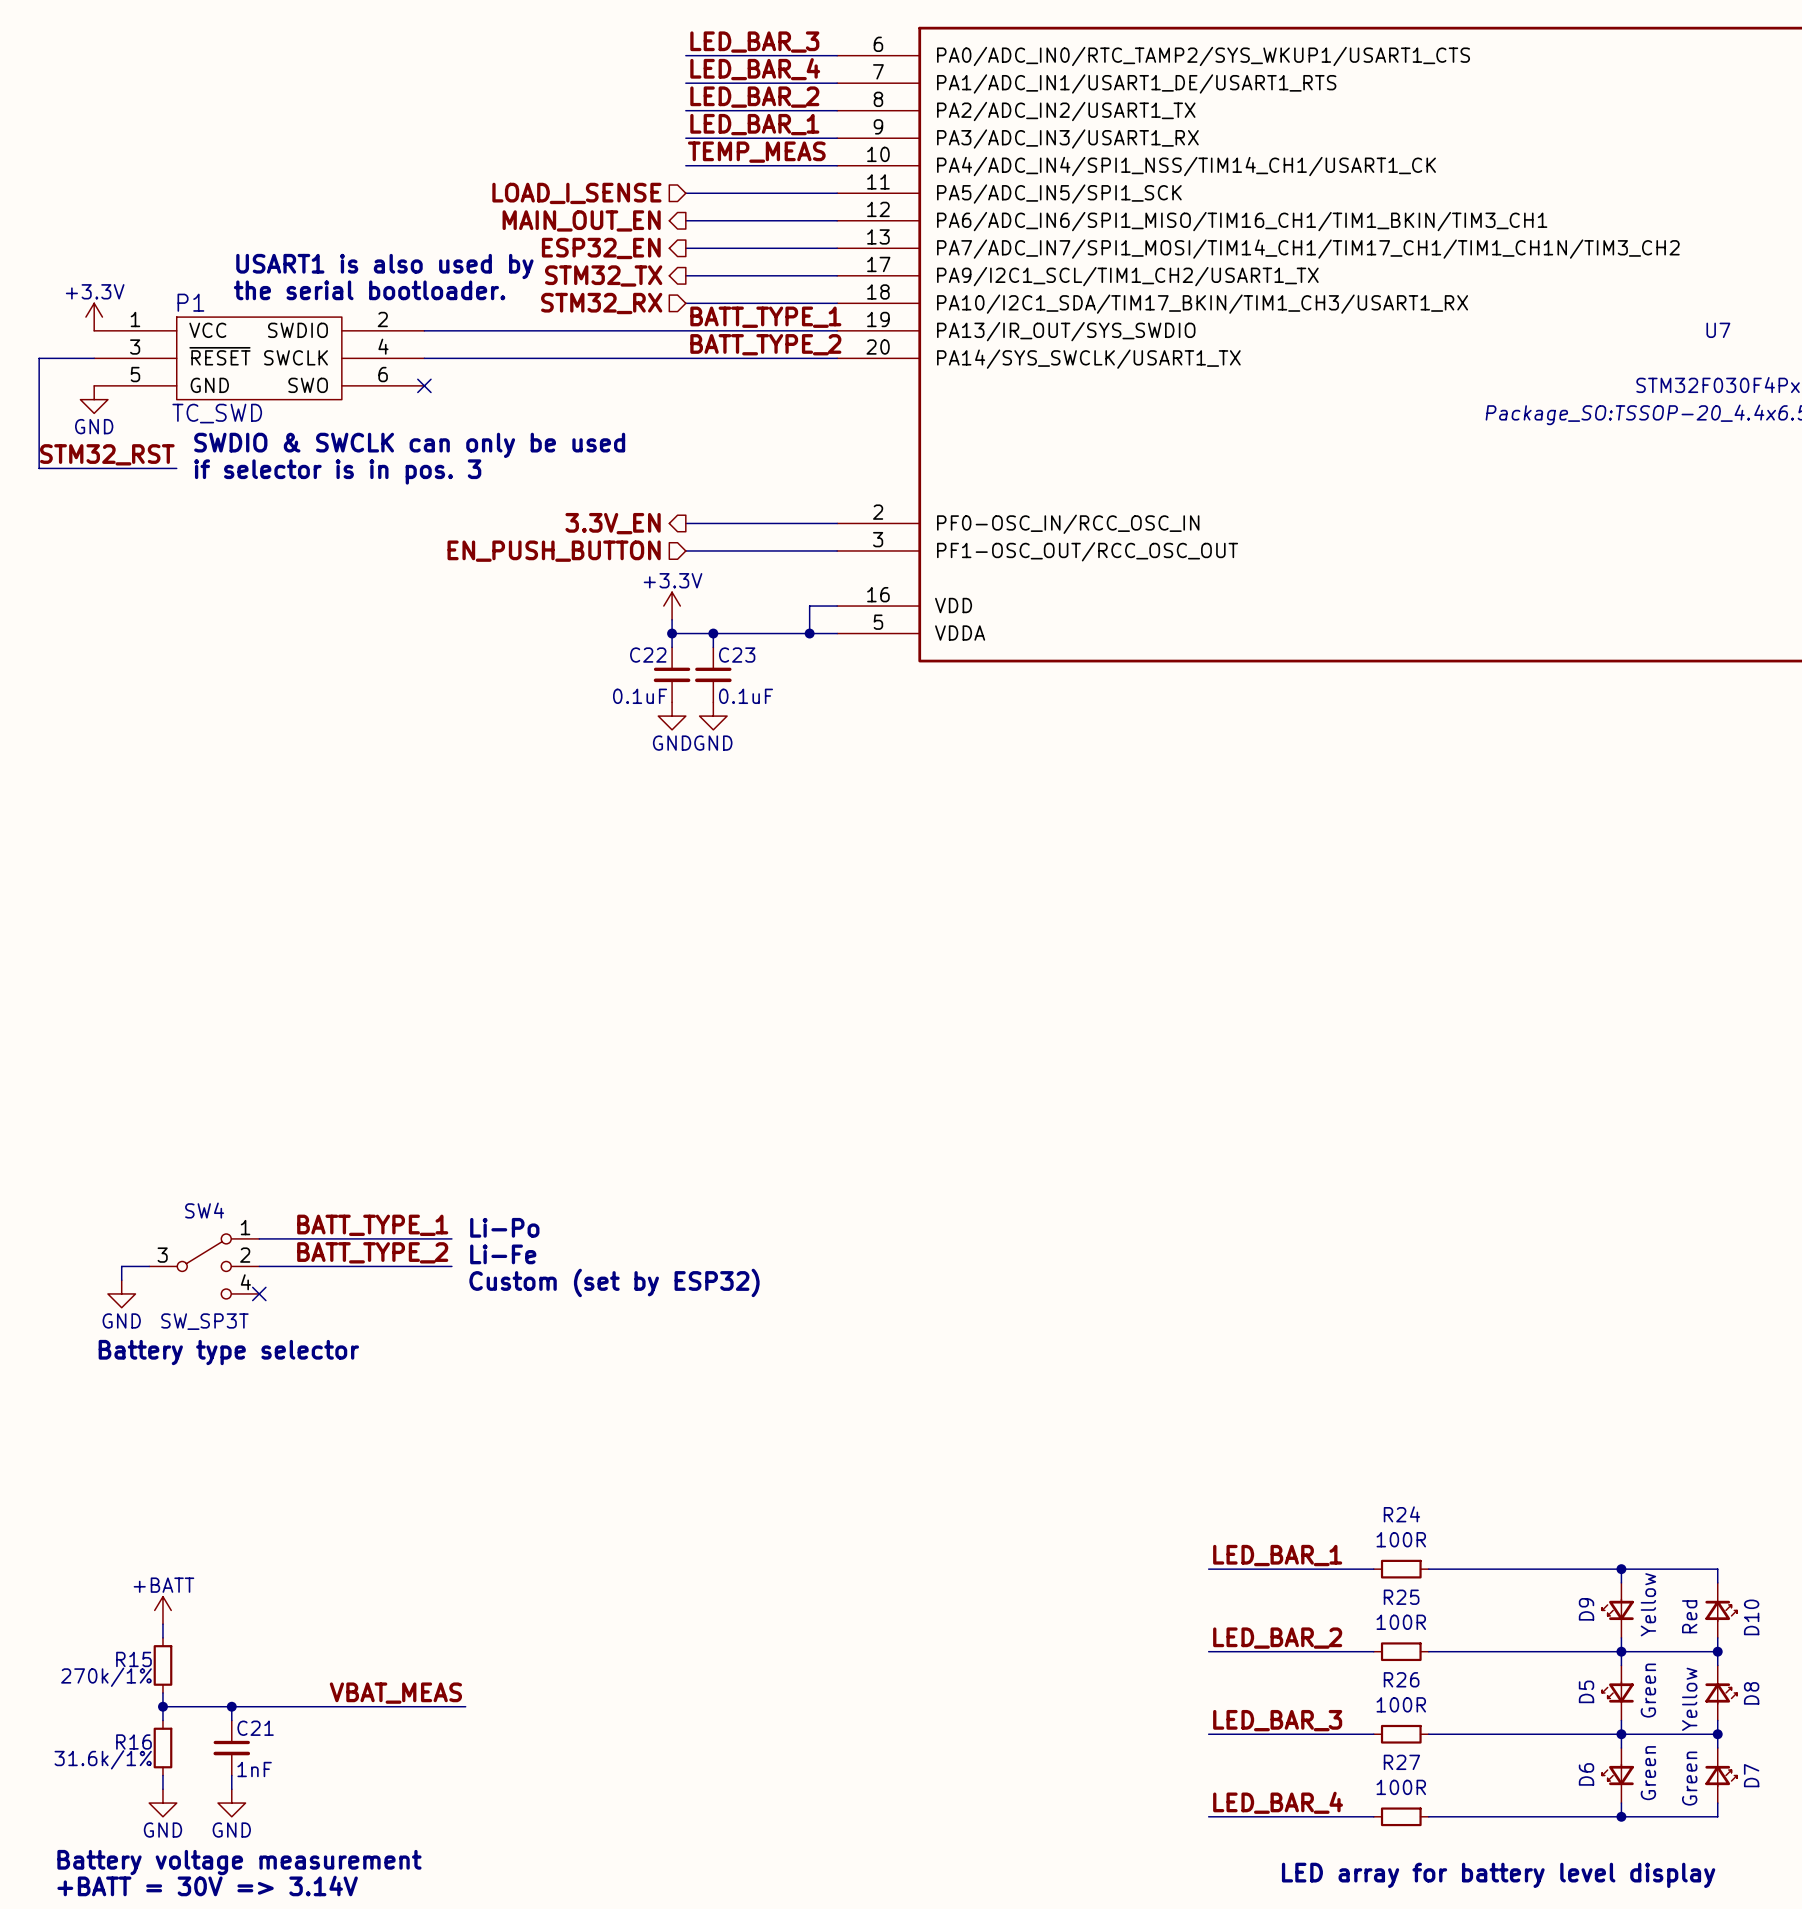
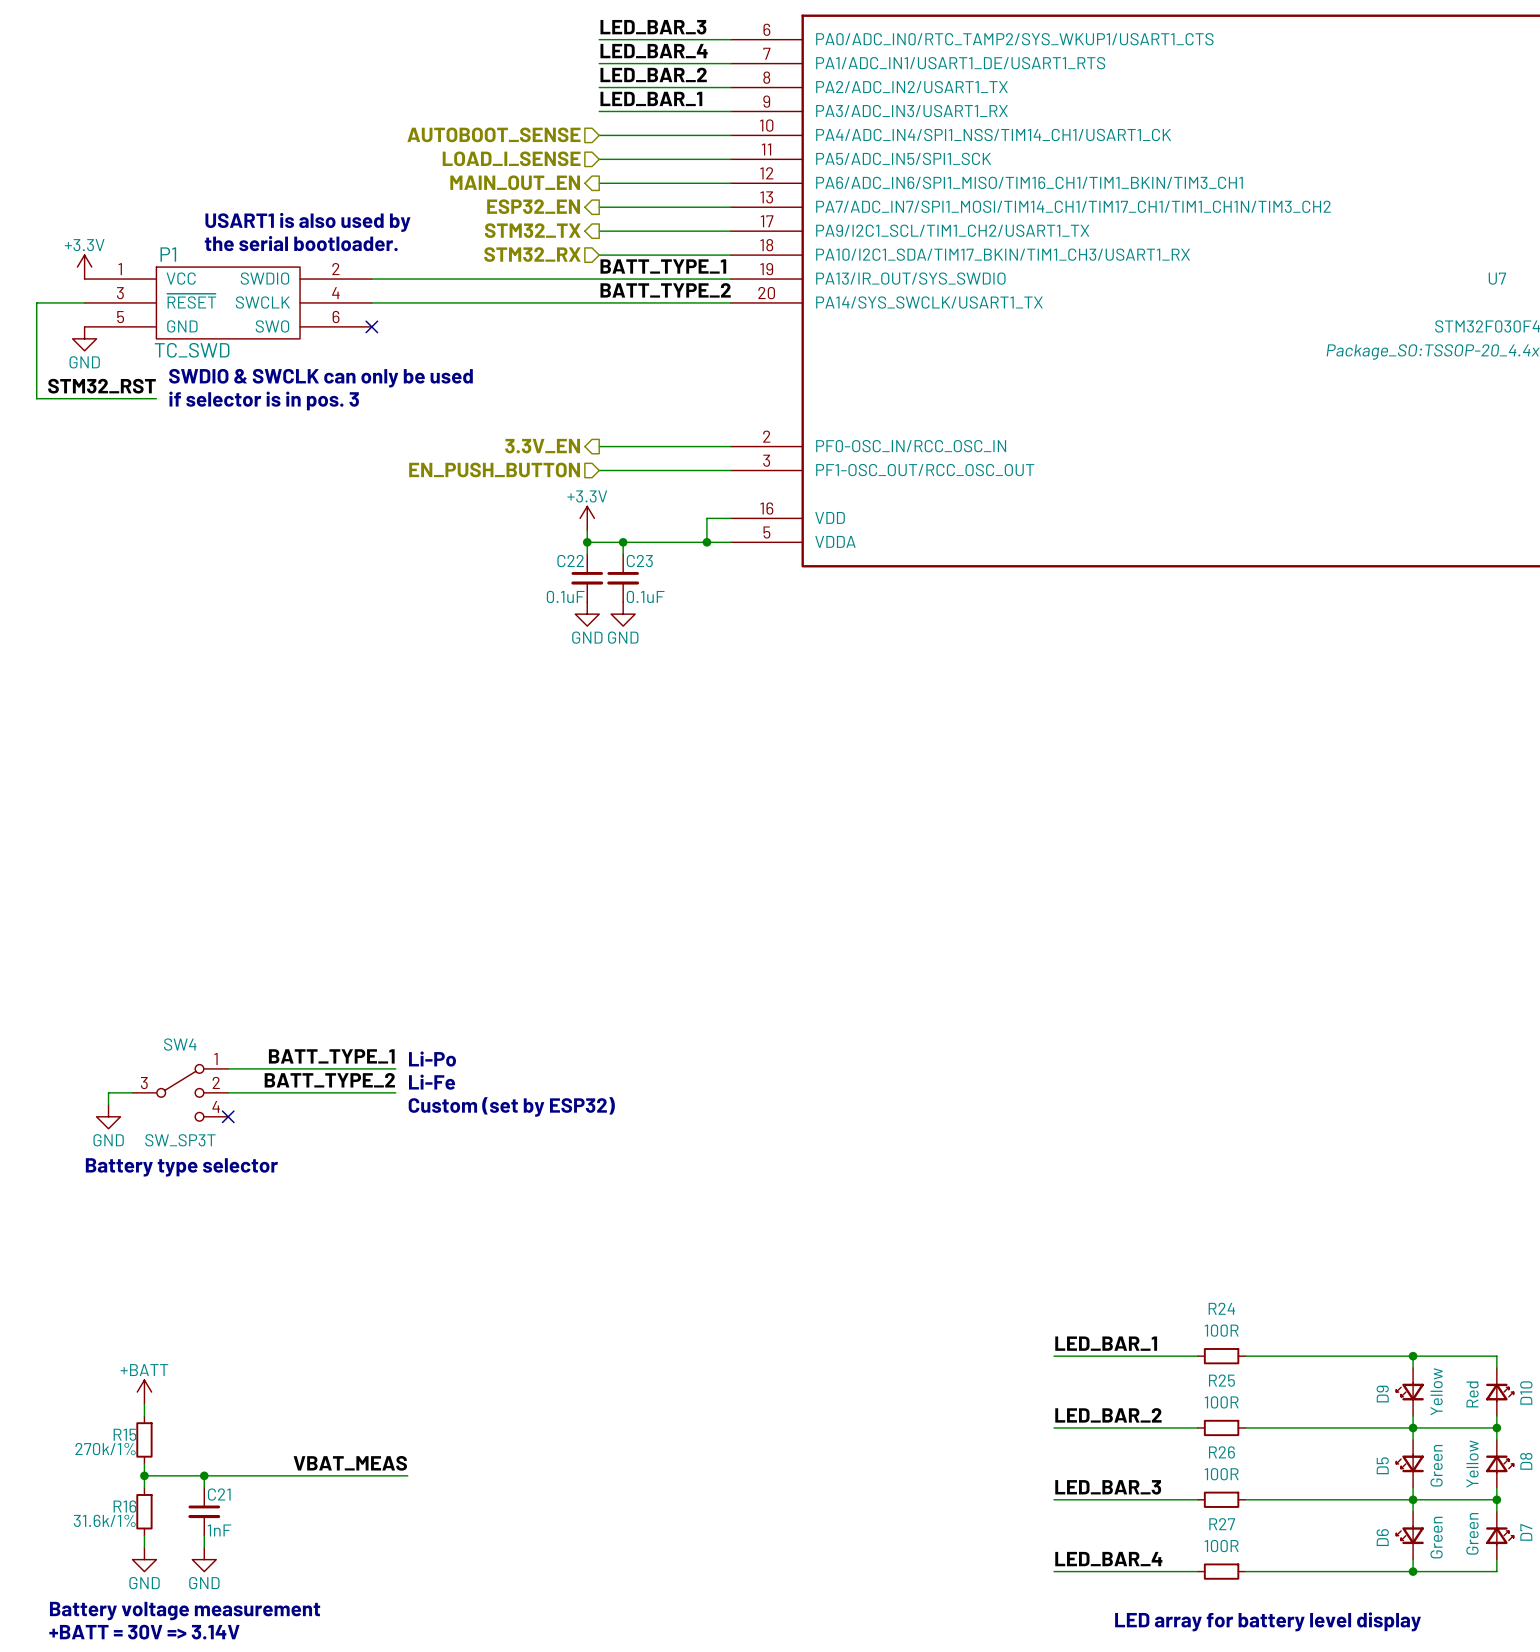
label: TEMP_MEAS (756, 152) -> none
hierarchical label: none -> AUTOBOOT_SENSE (493, 134)

